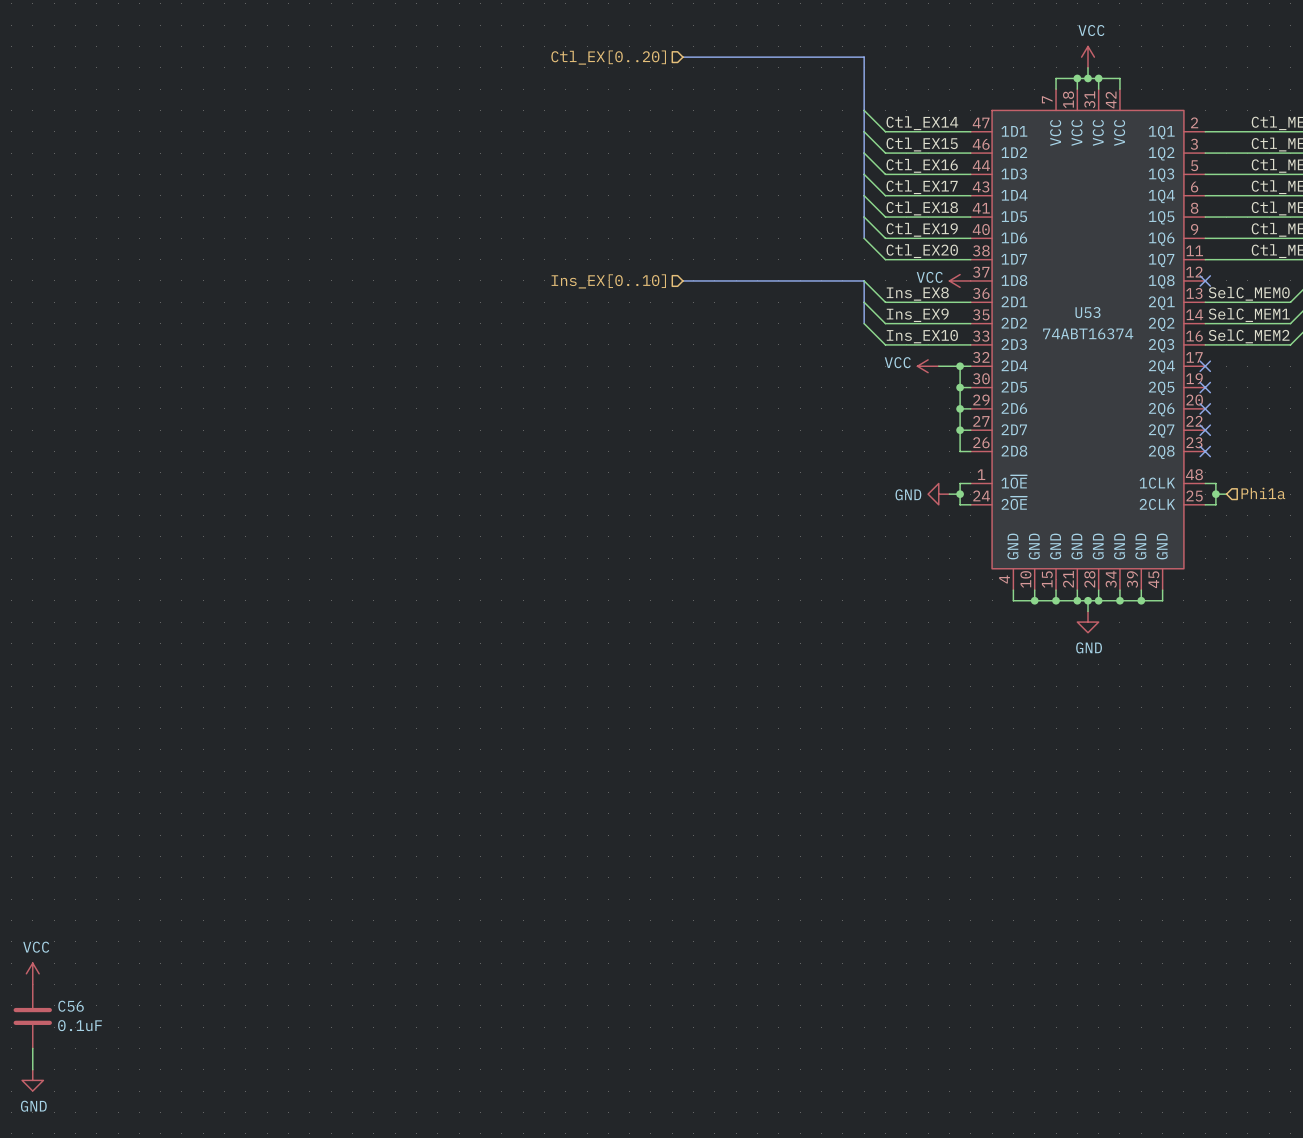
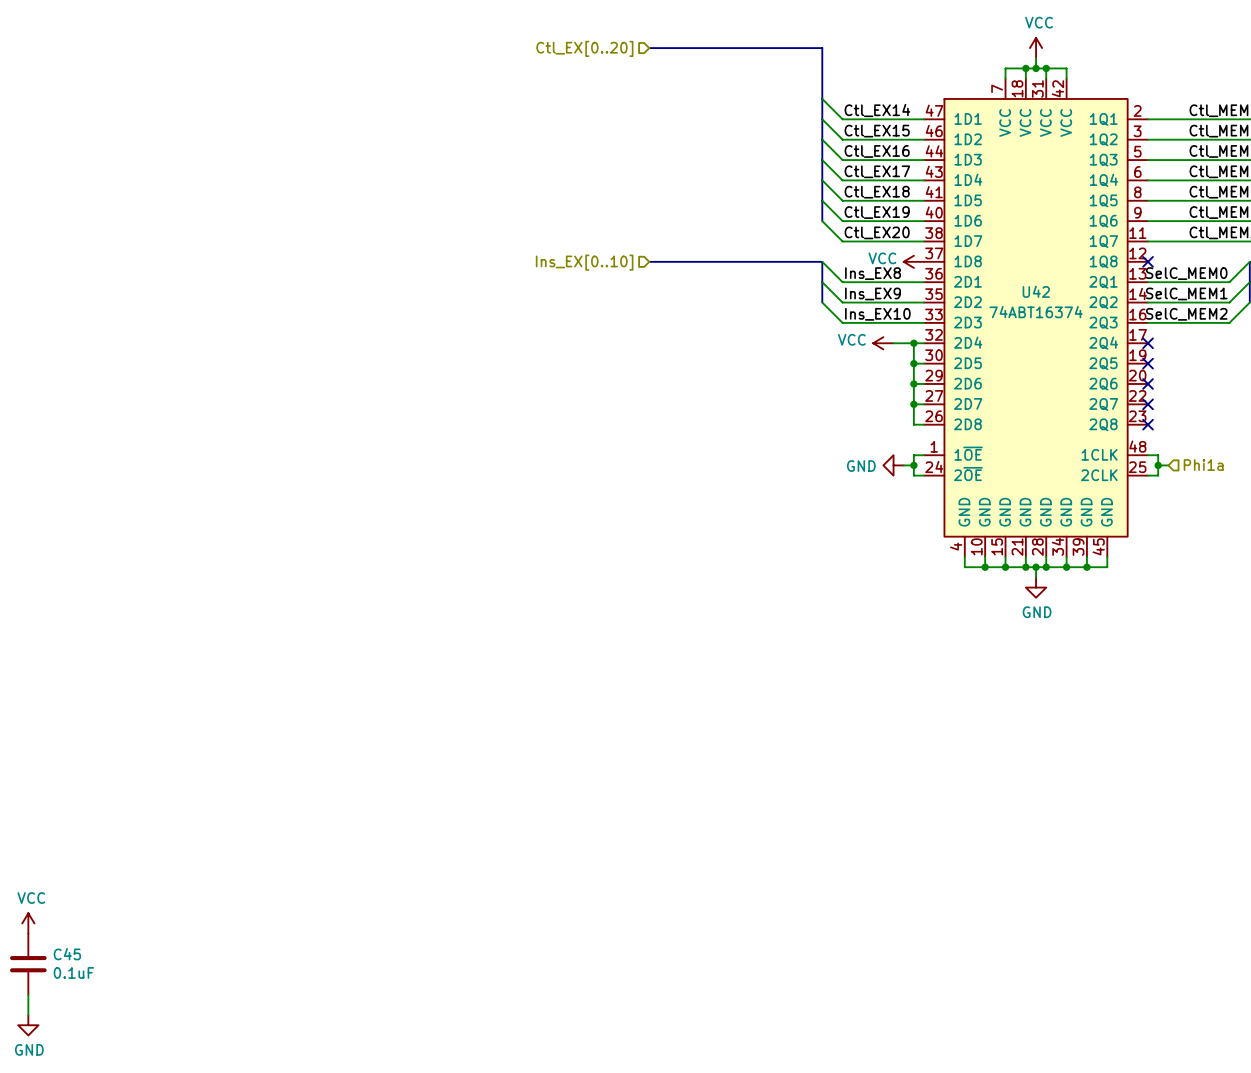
U53 name: U53 (1087, 312) -> U42 (1036, 291)
C56 name: C56 (71, 1006) -> C45 (67, 954)

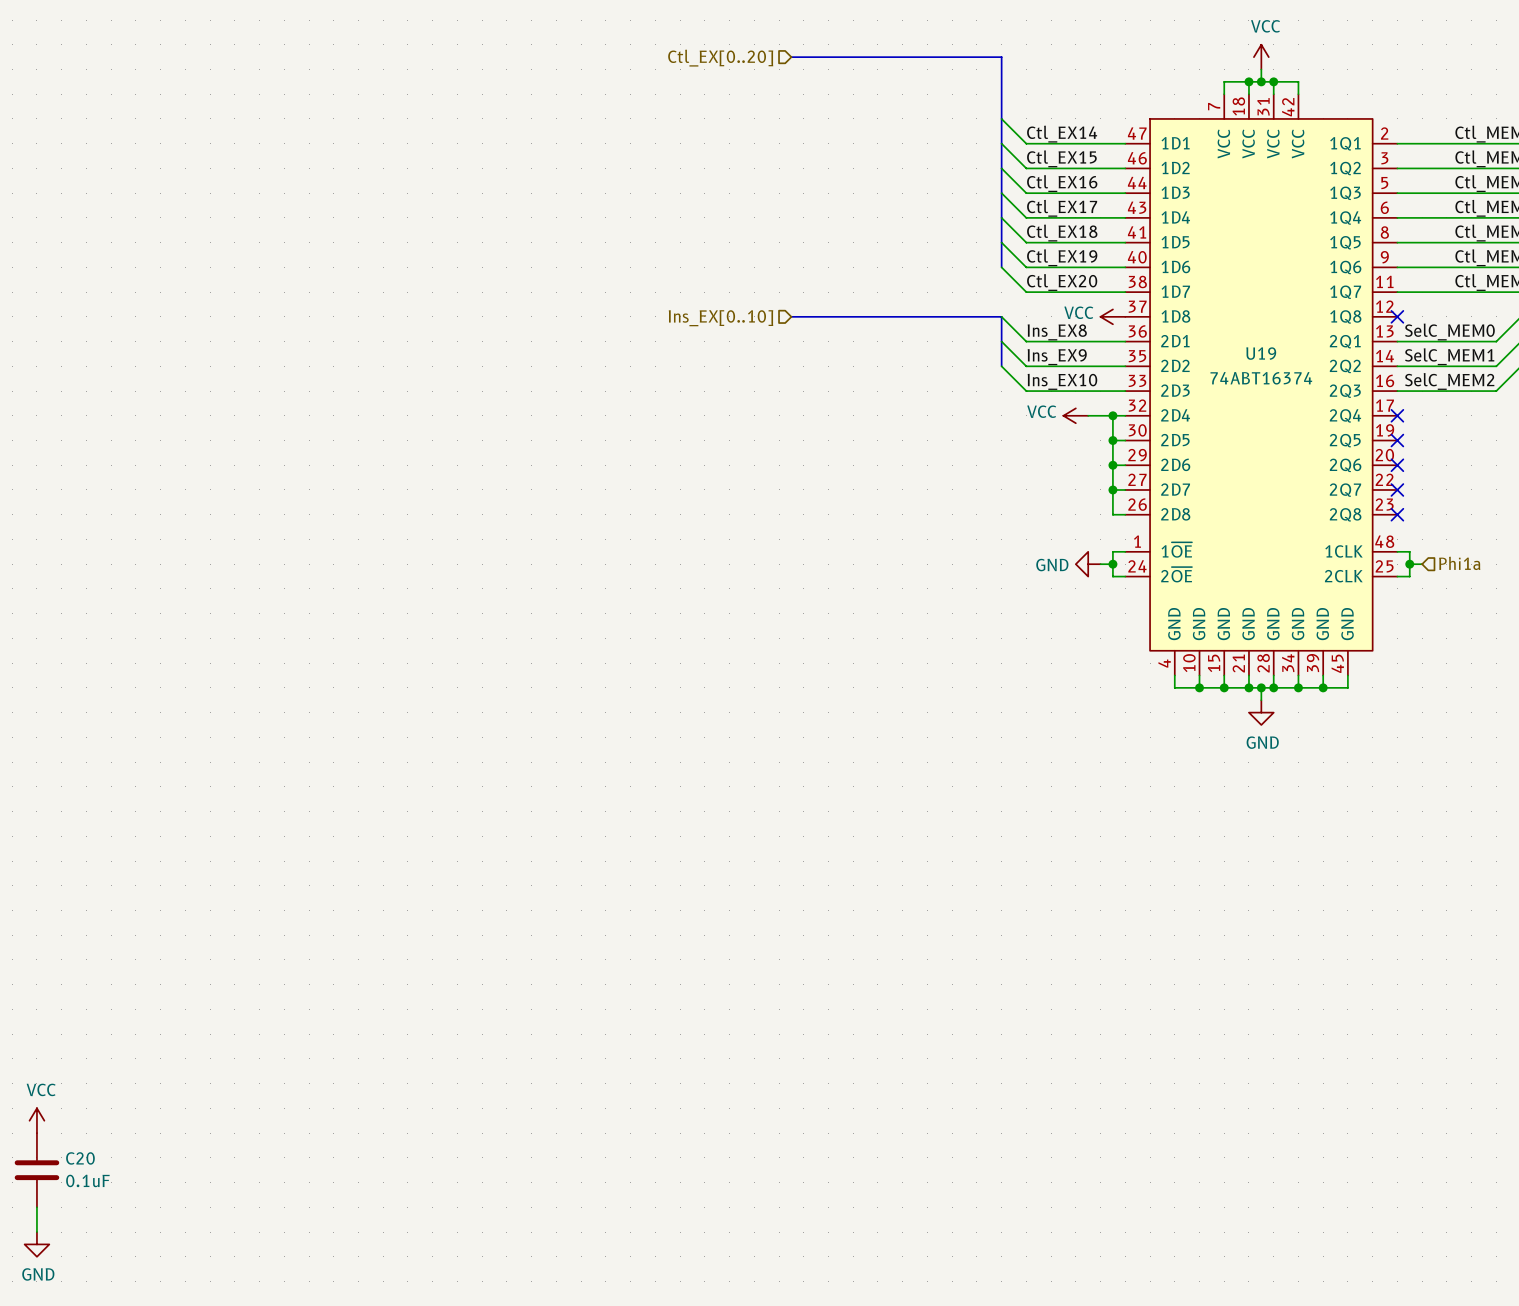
U42 name: U42 (1036, 291) -> U19 (1261, 353)
C45 name: C45 (67, 954) -> C20 (80, 1158)

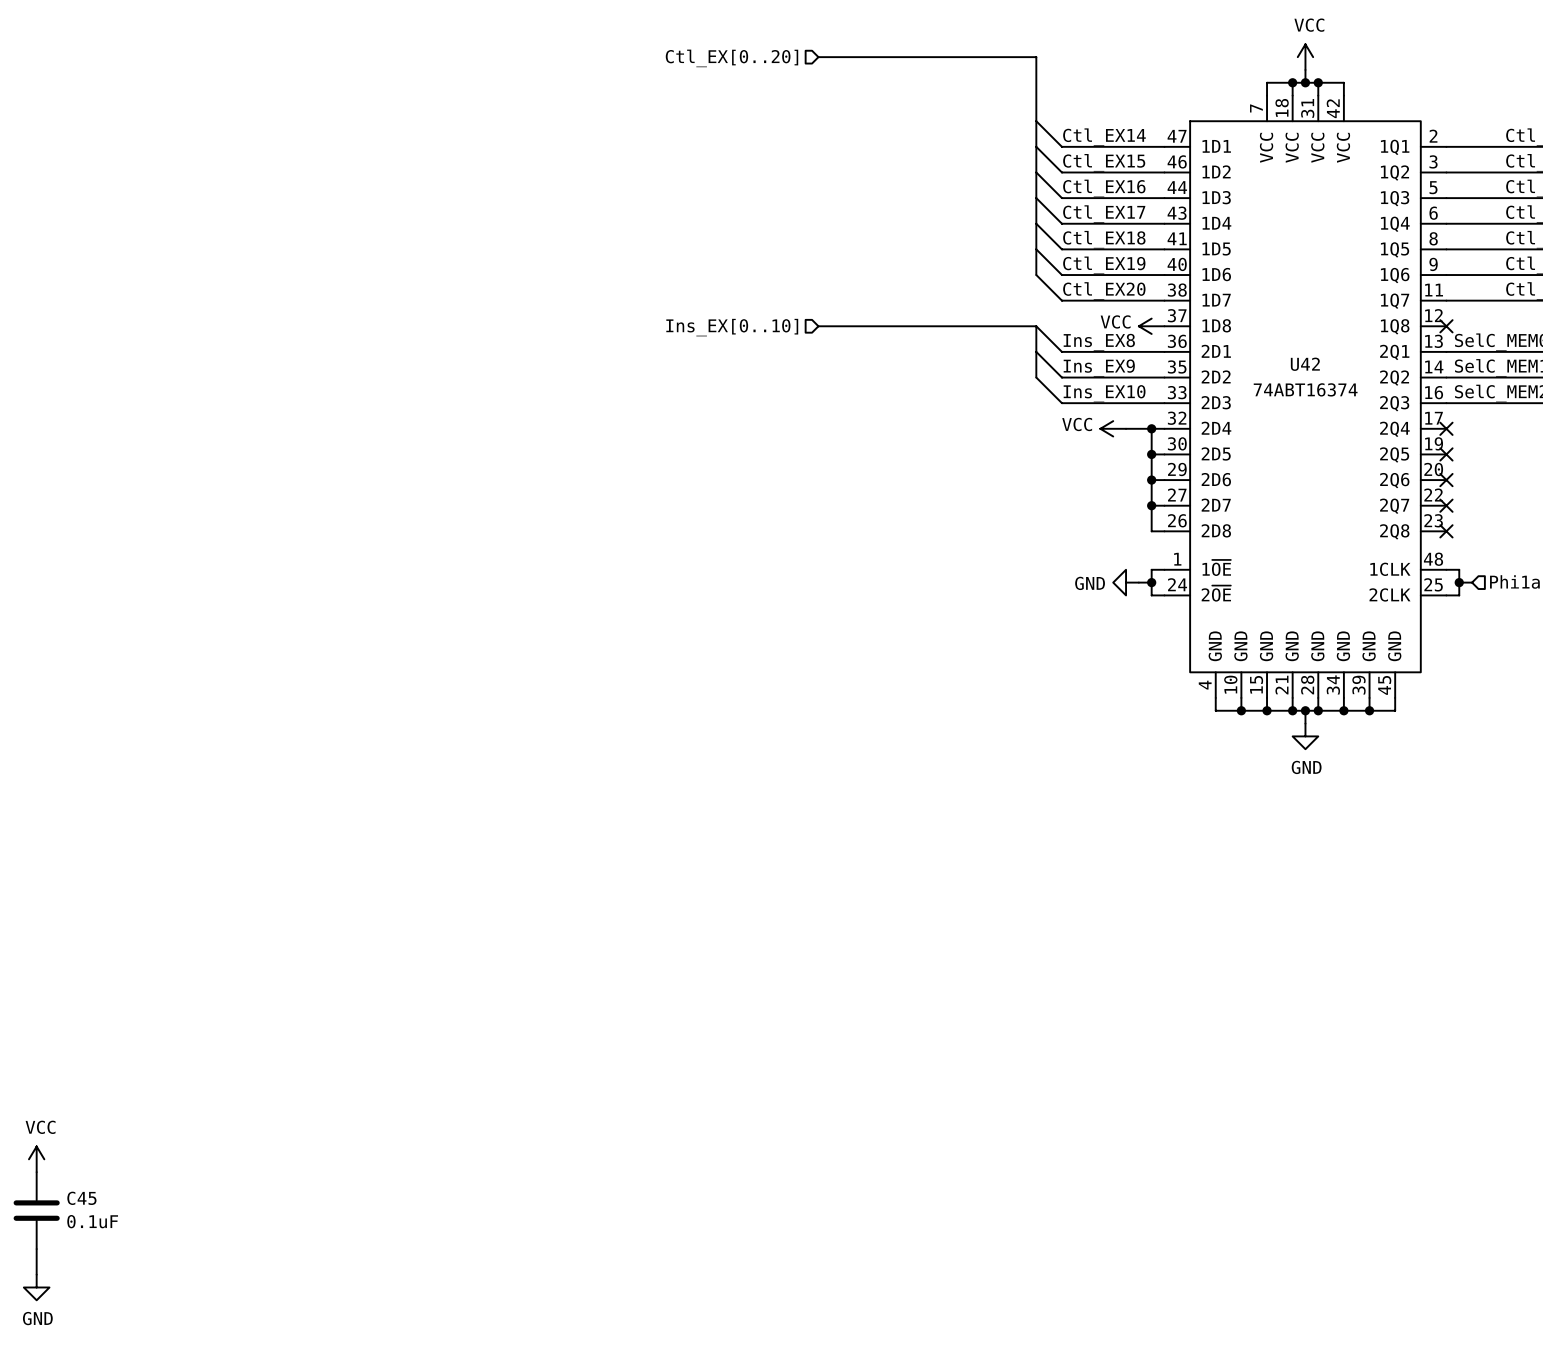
U19 name: U19 (1261, 353) -> U42 (1305, 364)
C20 name: C20 (80, 1158) -> C45 (81, 1198)

